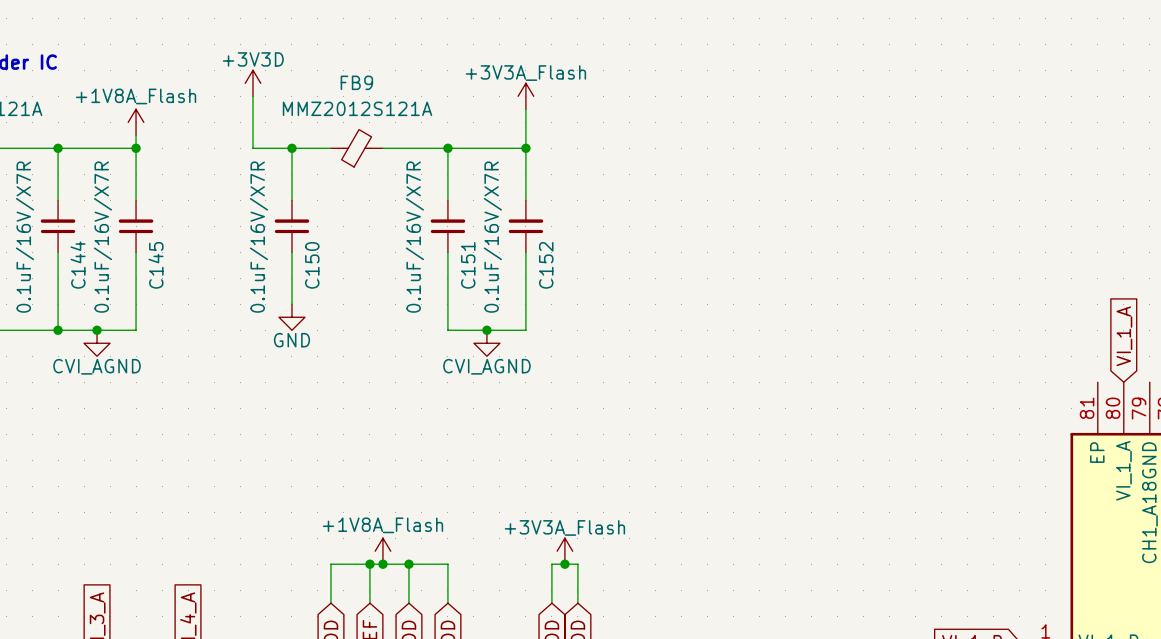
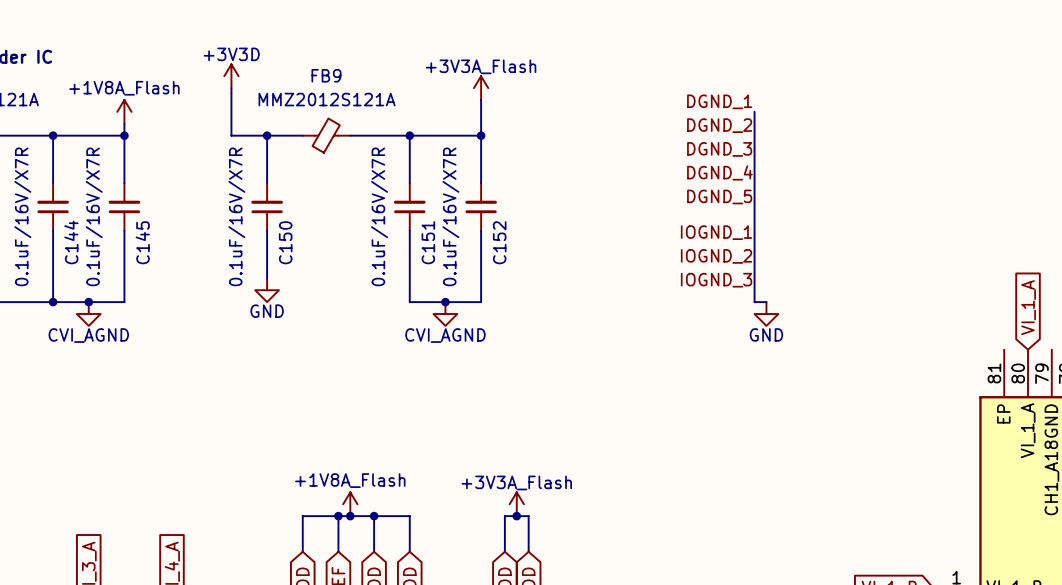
label: none -> DGND_1 (719, 101)
wire: none -> (754, 111) (754, 302) (766, 302)
label: none -> DGND_2 (719, 125)
label: none -> DGND_3 (719, 149)
label: none -> DGND_4 (719, 172)
label: none -> DGND_5 (719, 196)
label: none -> IOGND_1 (716, 232)
label: none -> IOGND_2 (716, 256)
label: none -> IOGND_3 (716, 280)
power symbol: none -> GND (766, 314)

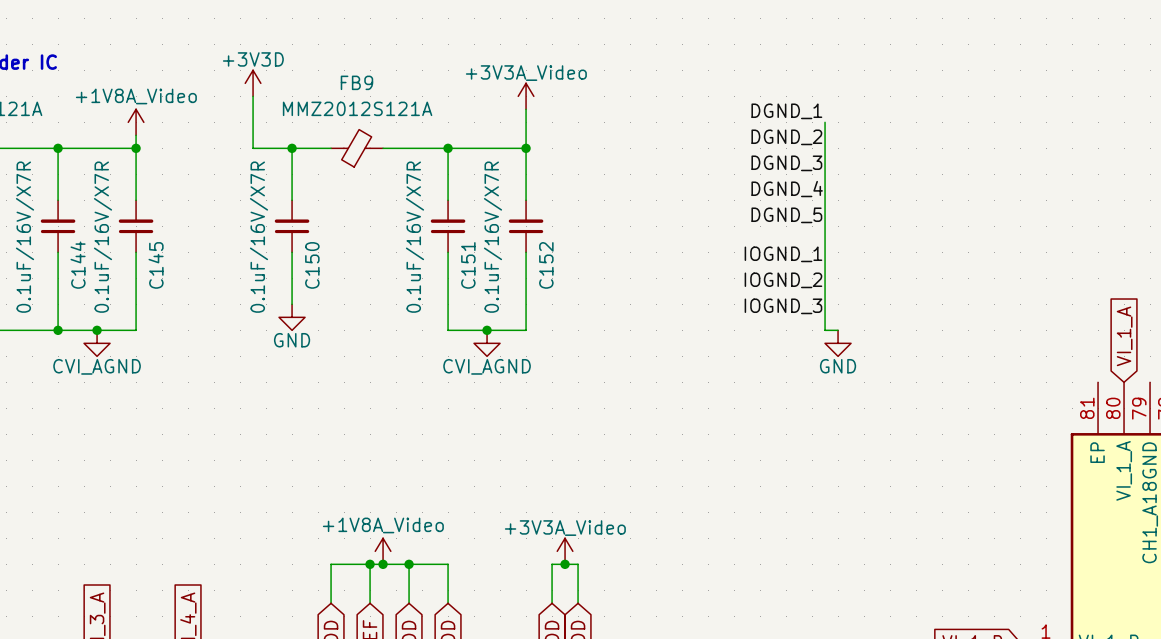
power symbol: +3V3A_Flash (481, 88) -> +3V3A_Video (526, 96)
power symbol: +1V8A_Flash (124, 111) -> +1V8A_Video (136, 122)
power symbol: +1V8A_Flash (350, 504) -> +1V8A_Video (383, 551)
power symbol: +3V3A_Flash (516, 504) -> +3V3A_Video (565, 551)

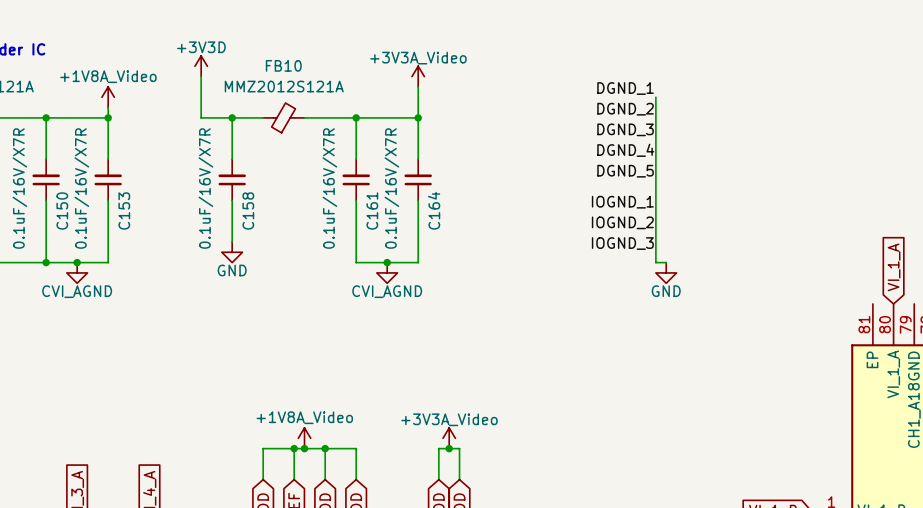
FB9 name: FB9 (356, 82) -> FB10 (283, 65)
C144 name: C144 (78, 265) -> C150 (62, 211)
C145 name: C145 (156, 265) -> C153 (124, 211)
C150 name: C150 (312, 265) -> C158 (248, 211)
C151 name: C151 (468, 265) -> C161 (372, 211)
C152 name: C152 (546, 265) -> C164 (434, 210)

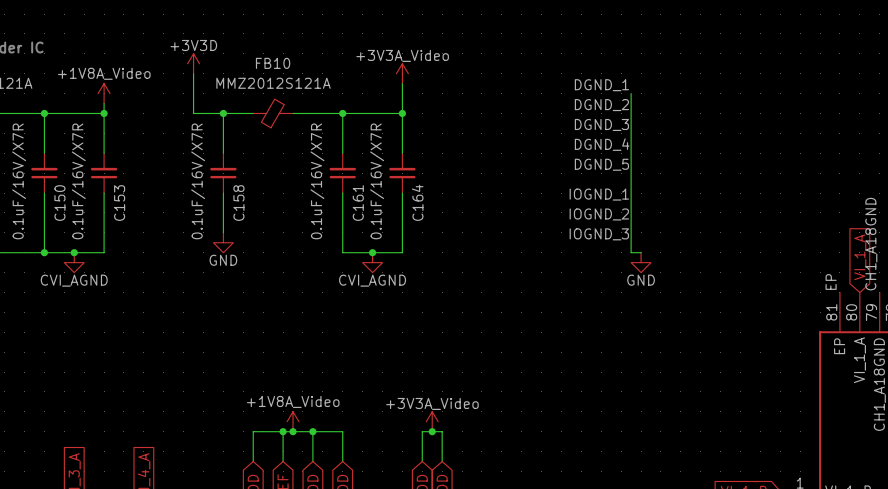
label: none -> CH1_A18GND (871, 244)
label: none -> EP (831, 281)

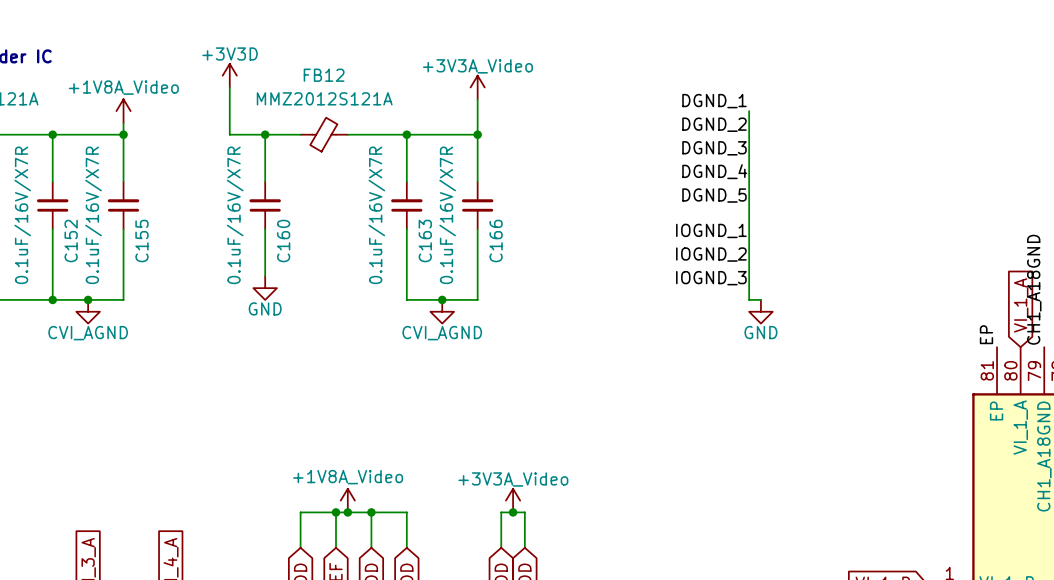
FB10 name: FB10 (273, 63) -> FB12 (324, 75)
C164 name: C164 (417, 202) -> C166 (496, 241)
C150 name: C150 (59, 203) -> C152 (71, 241)
C153 name: C153 (119, 203) -> C155 (141, 241)
C158 name: C158 (238, 203) -> C160 (283, 241)
C161 name: C161 (358, 203) -> C163 (425, 241)

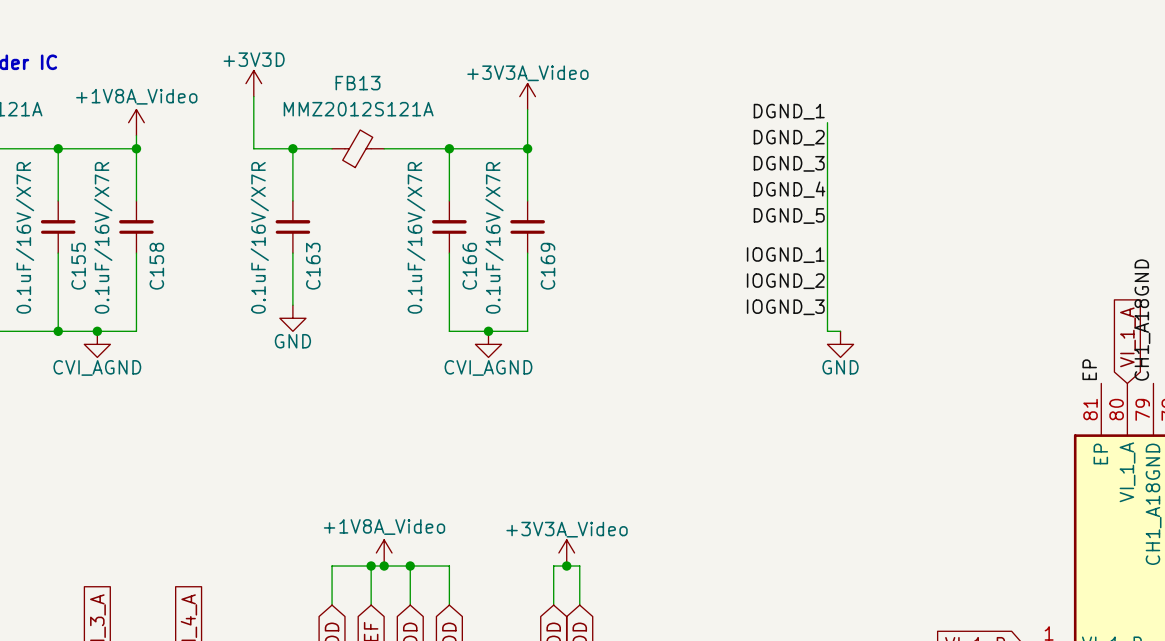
FB12 name: FB12 (324, 75) -> FB13 (358, 83)
C152 name: C152 (71, 241) -> C155 (78, 266)
C155 name: C155 (141, 241) -> C158 (156, 266)
C160 name: C160 (283, 241) -> C163 (313, 266)
C163 name: C163 (425, 241) -> C166 (469, 266)
C166 name: C166 (496, 241) -> C169 (547, 266)

